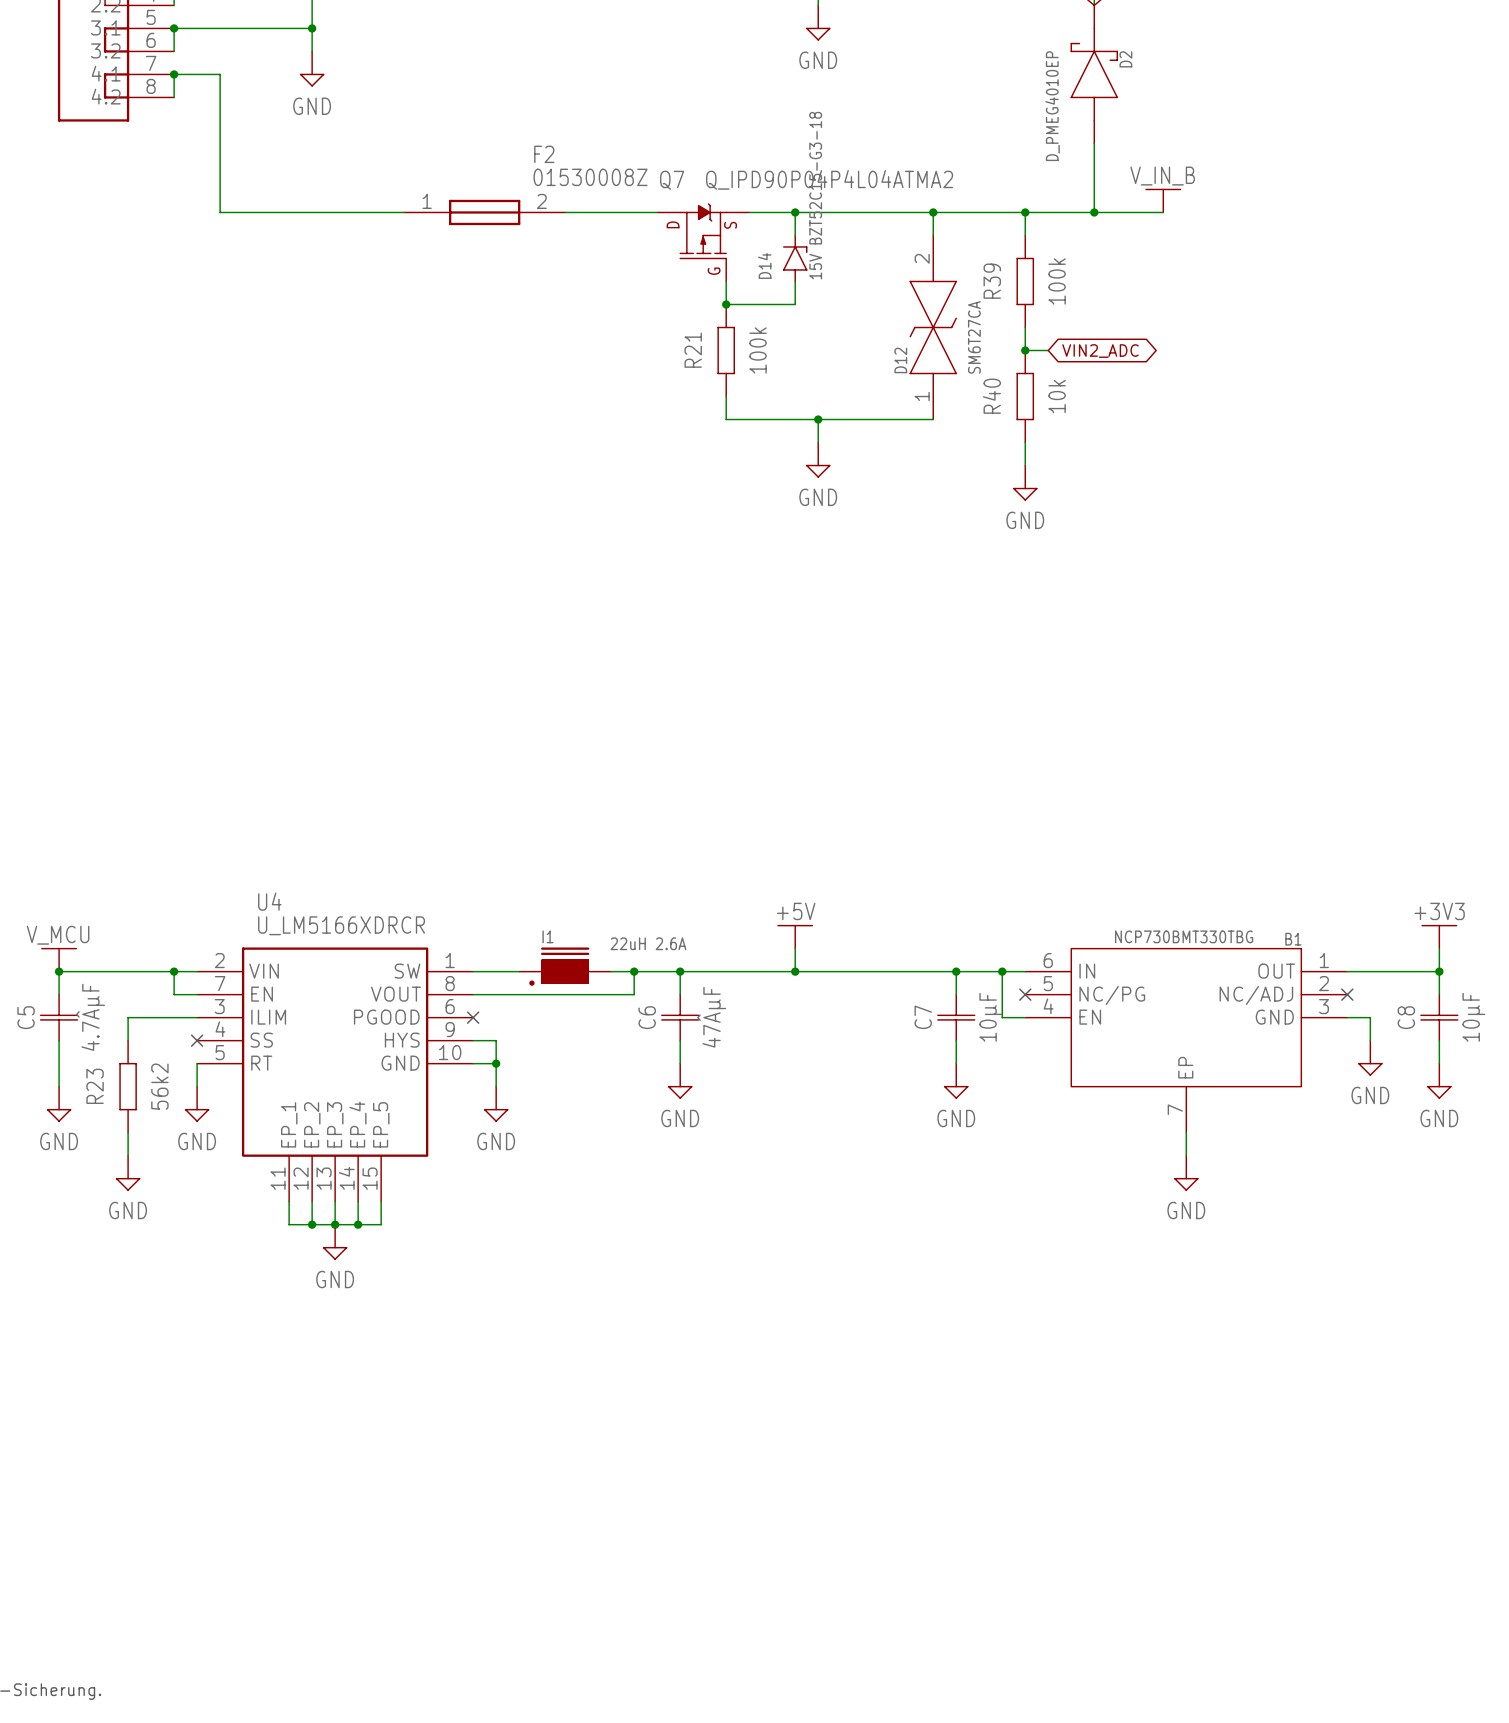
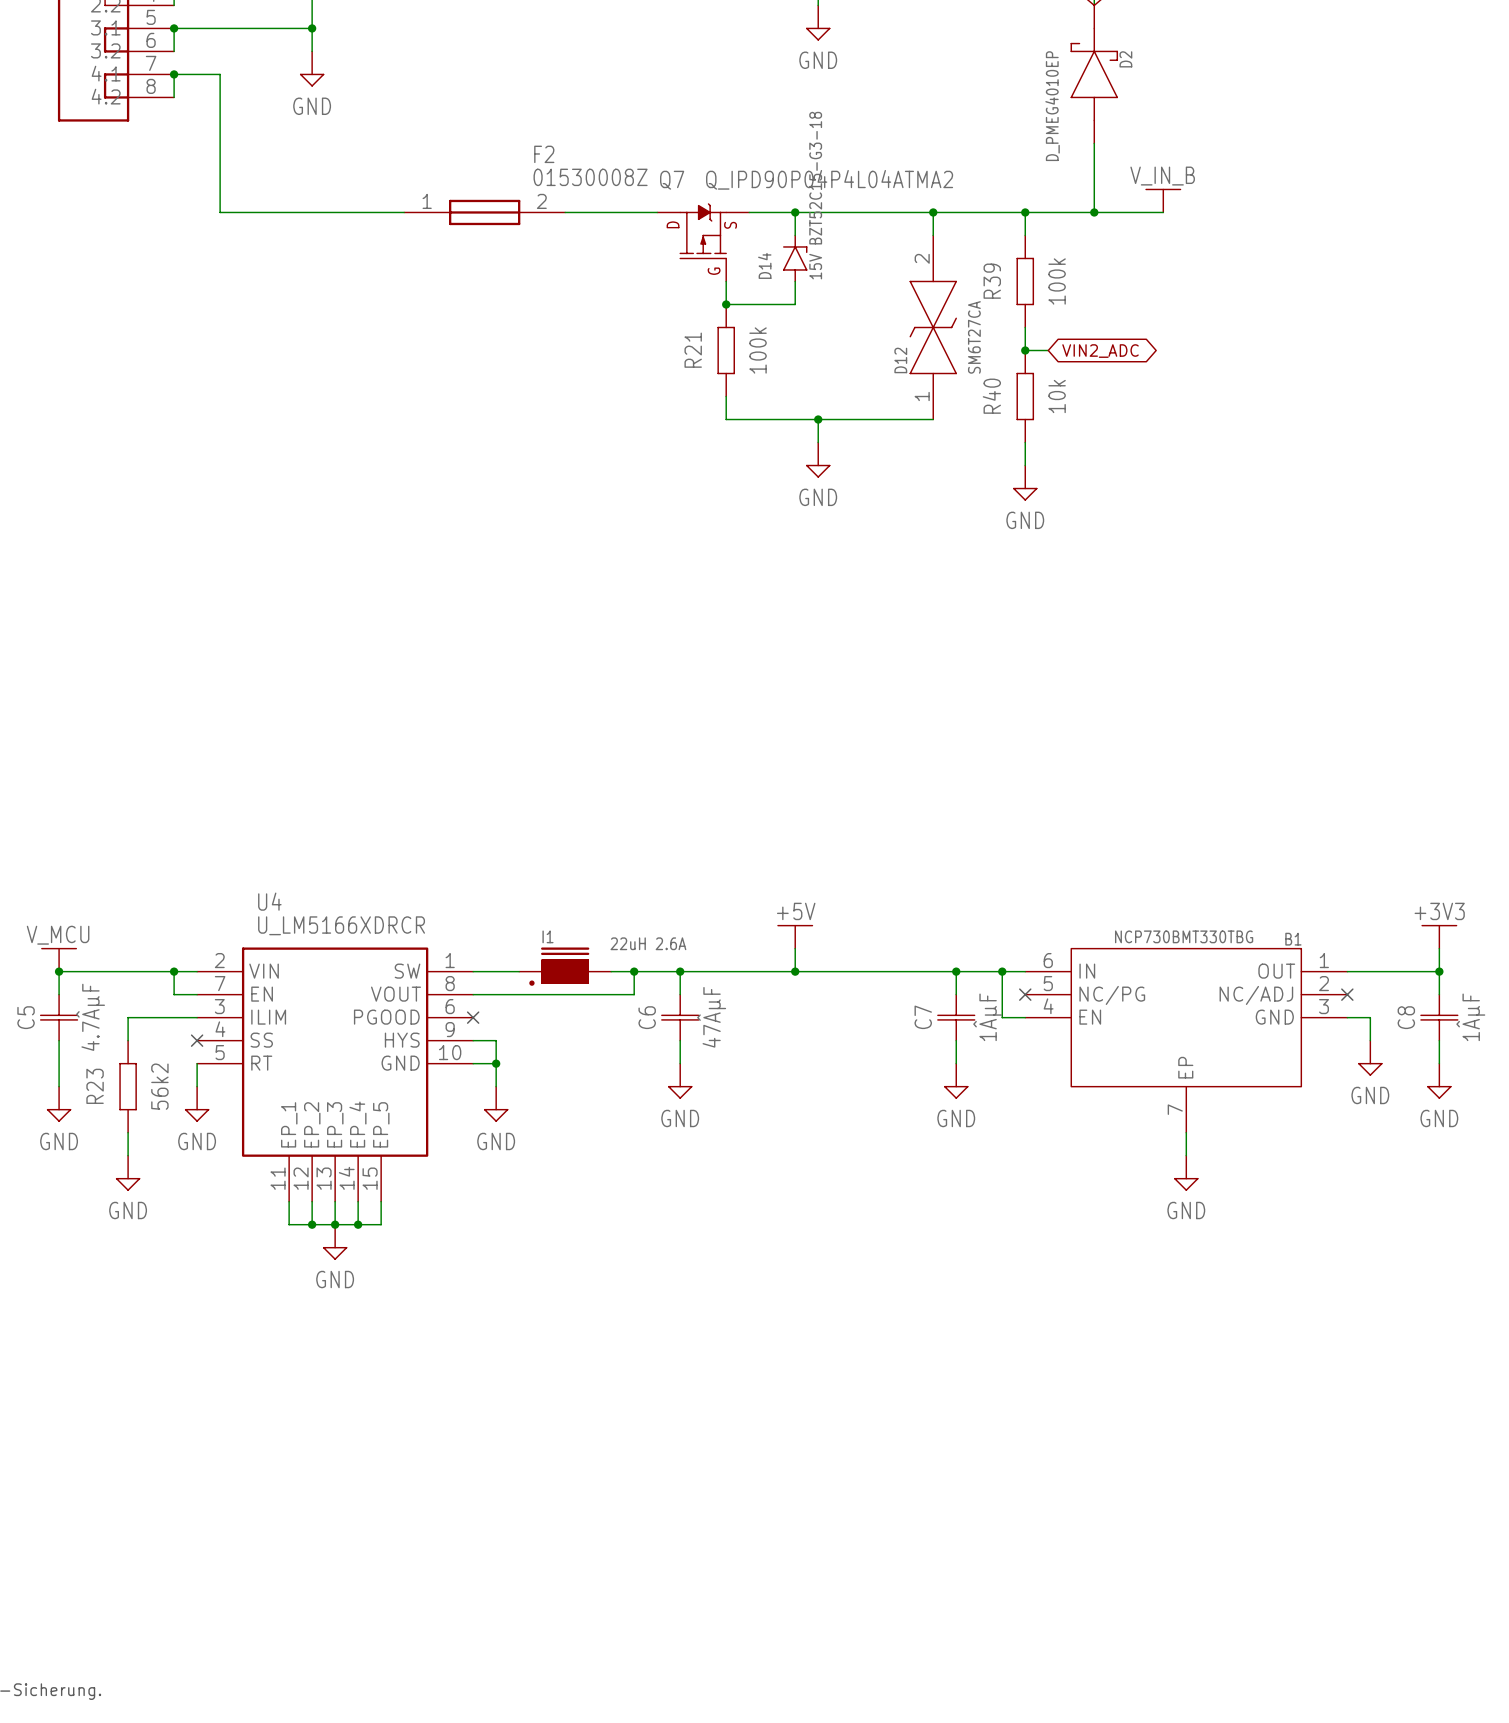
C7 value: 10µF (990, 1017) -> 1ÂµF (987, 1017)
C8 value: 10µF (1473, 1017) -> 1ÂµF (1470, 1017)

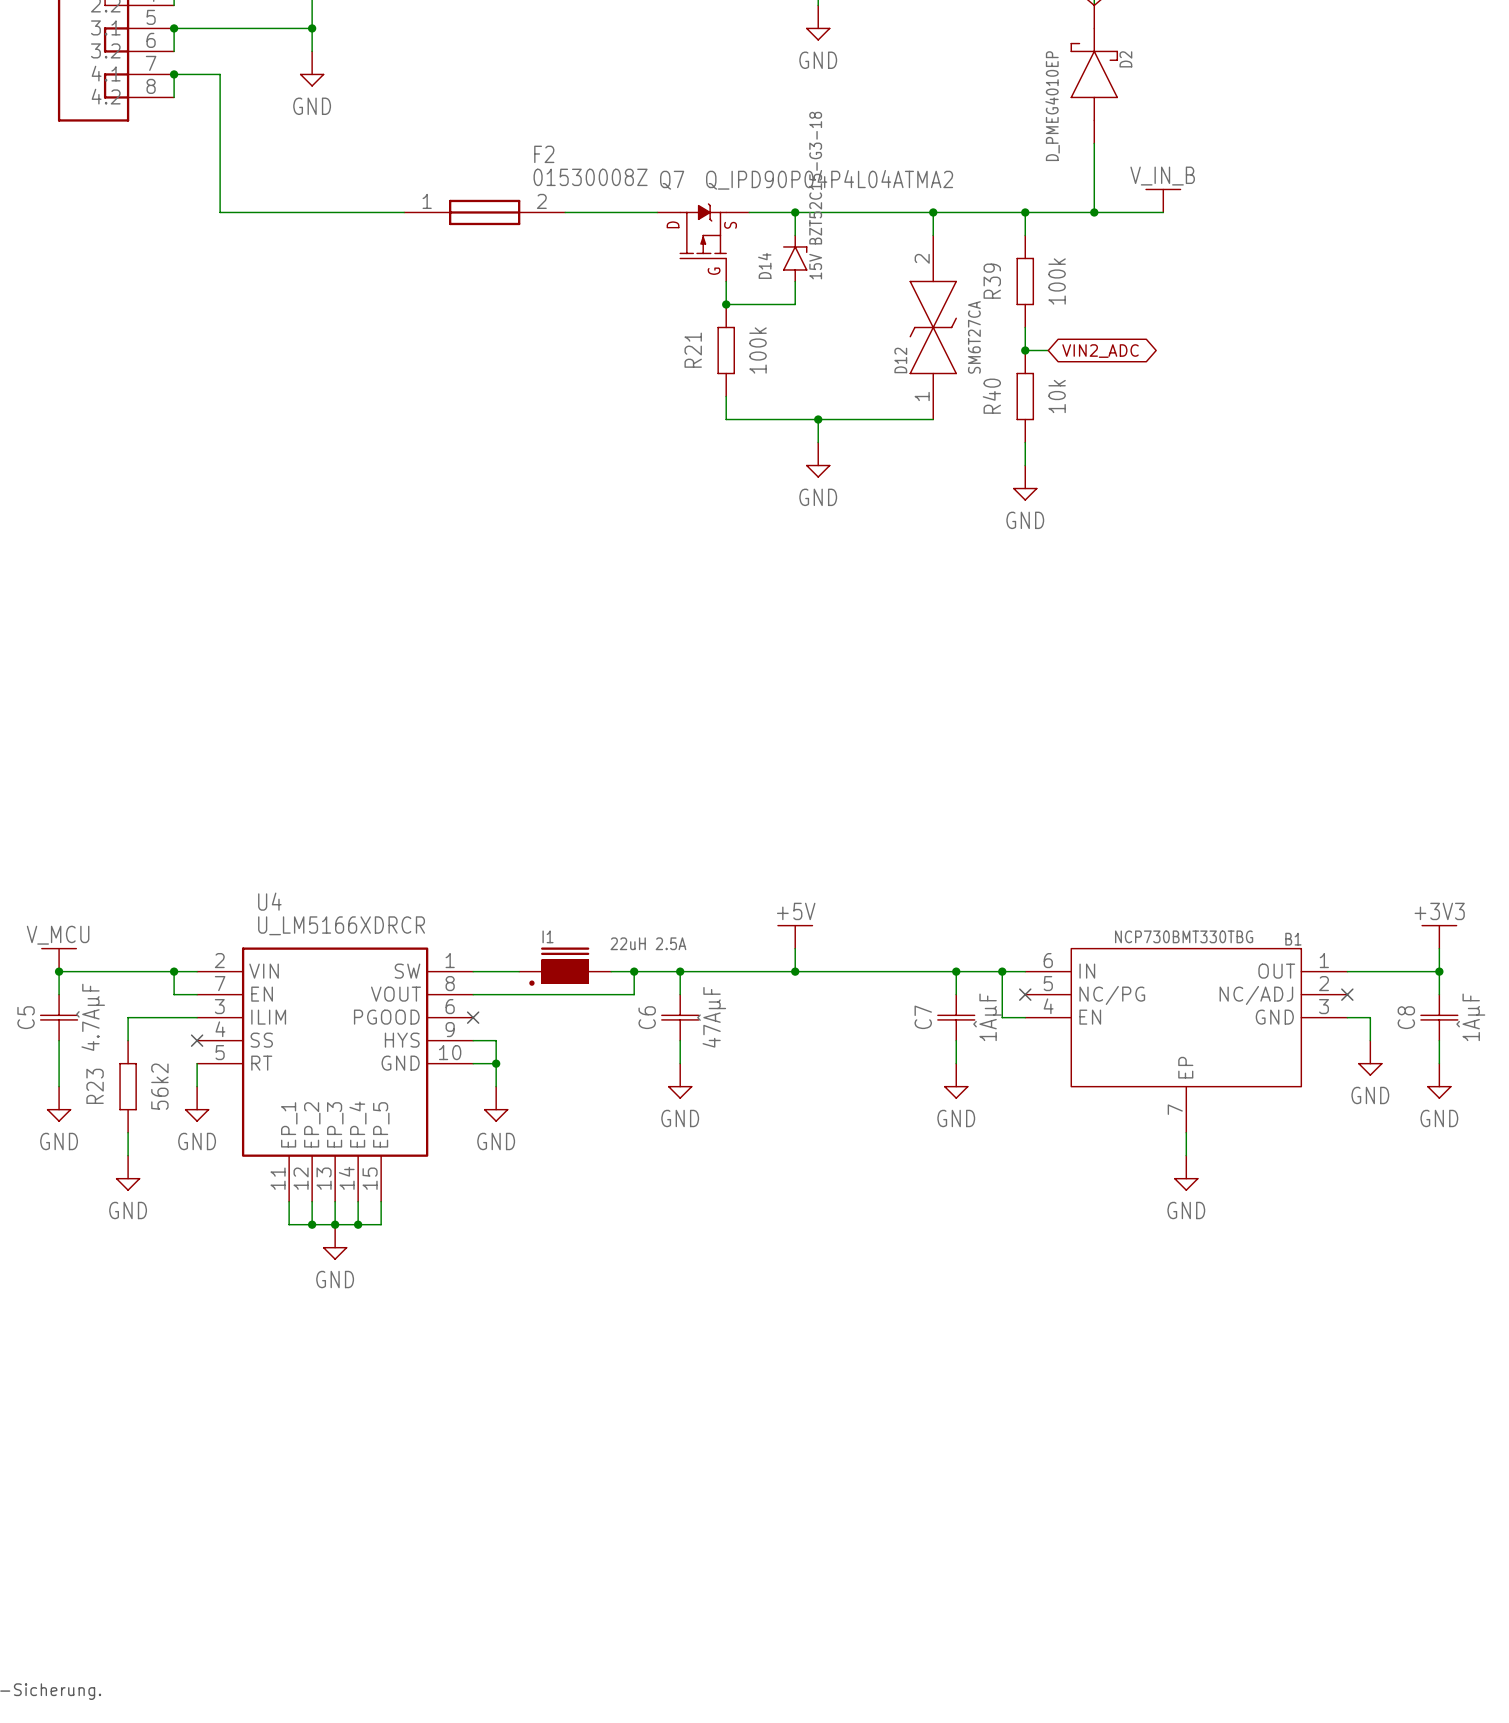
I1 value: 22uH 2.6A (648, 943) -> 22uH 2.5A (648, 943)

